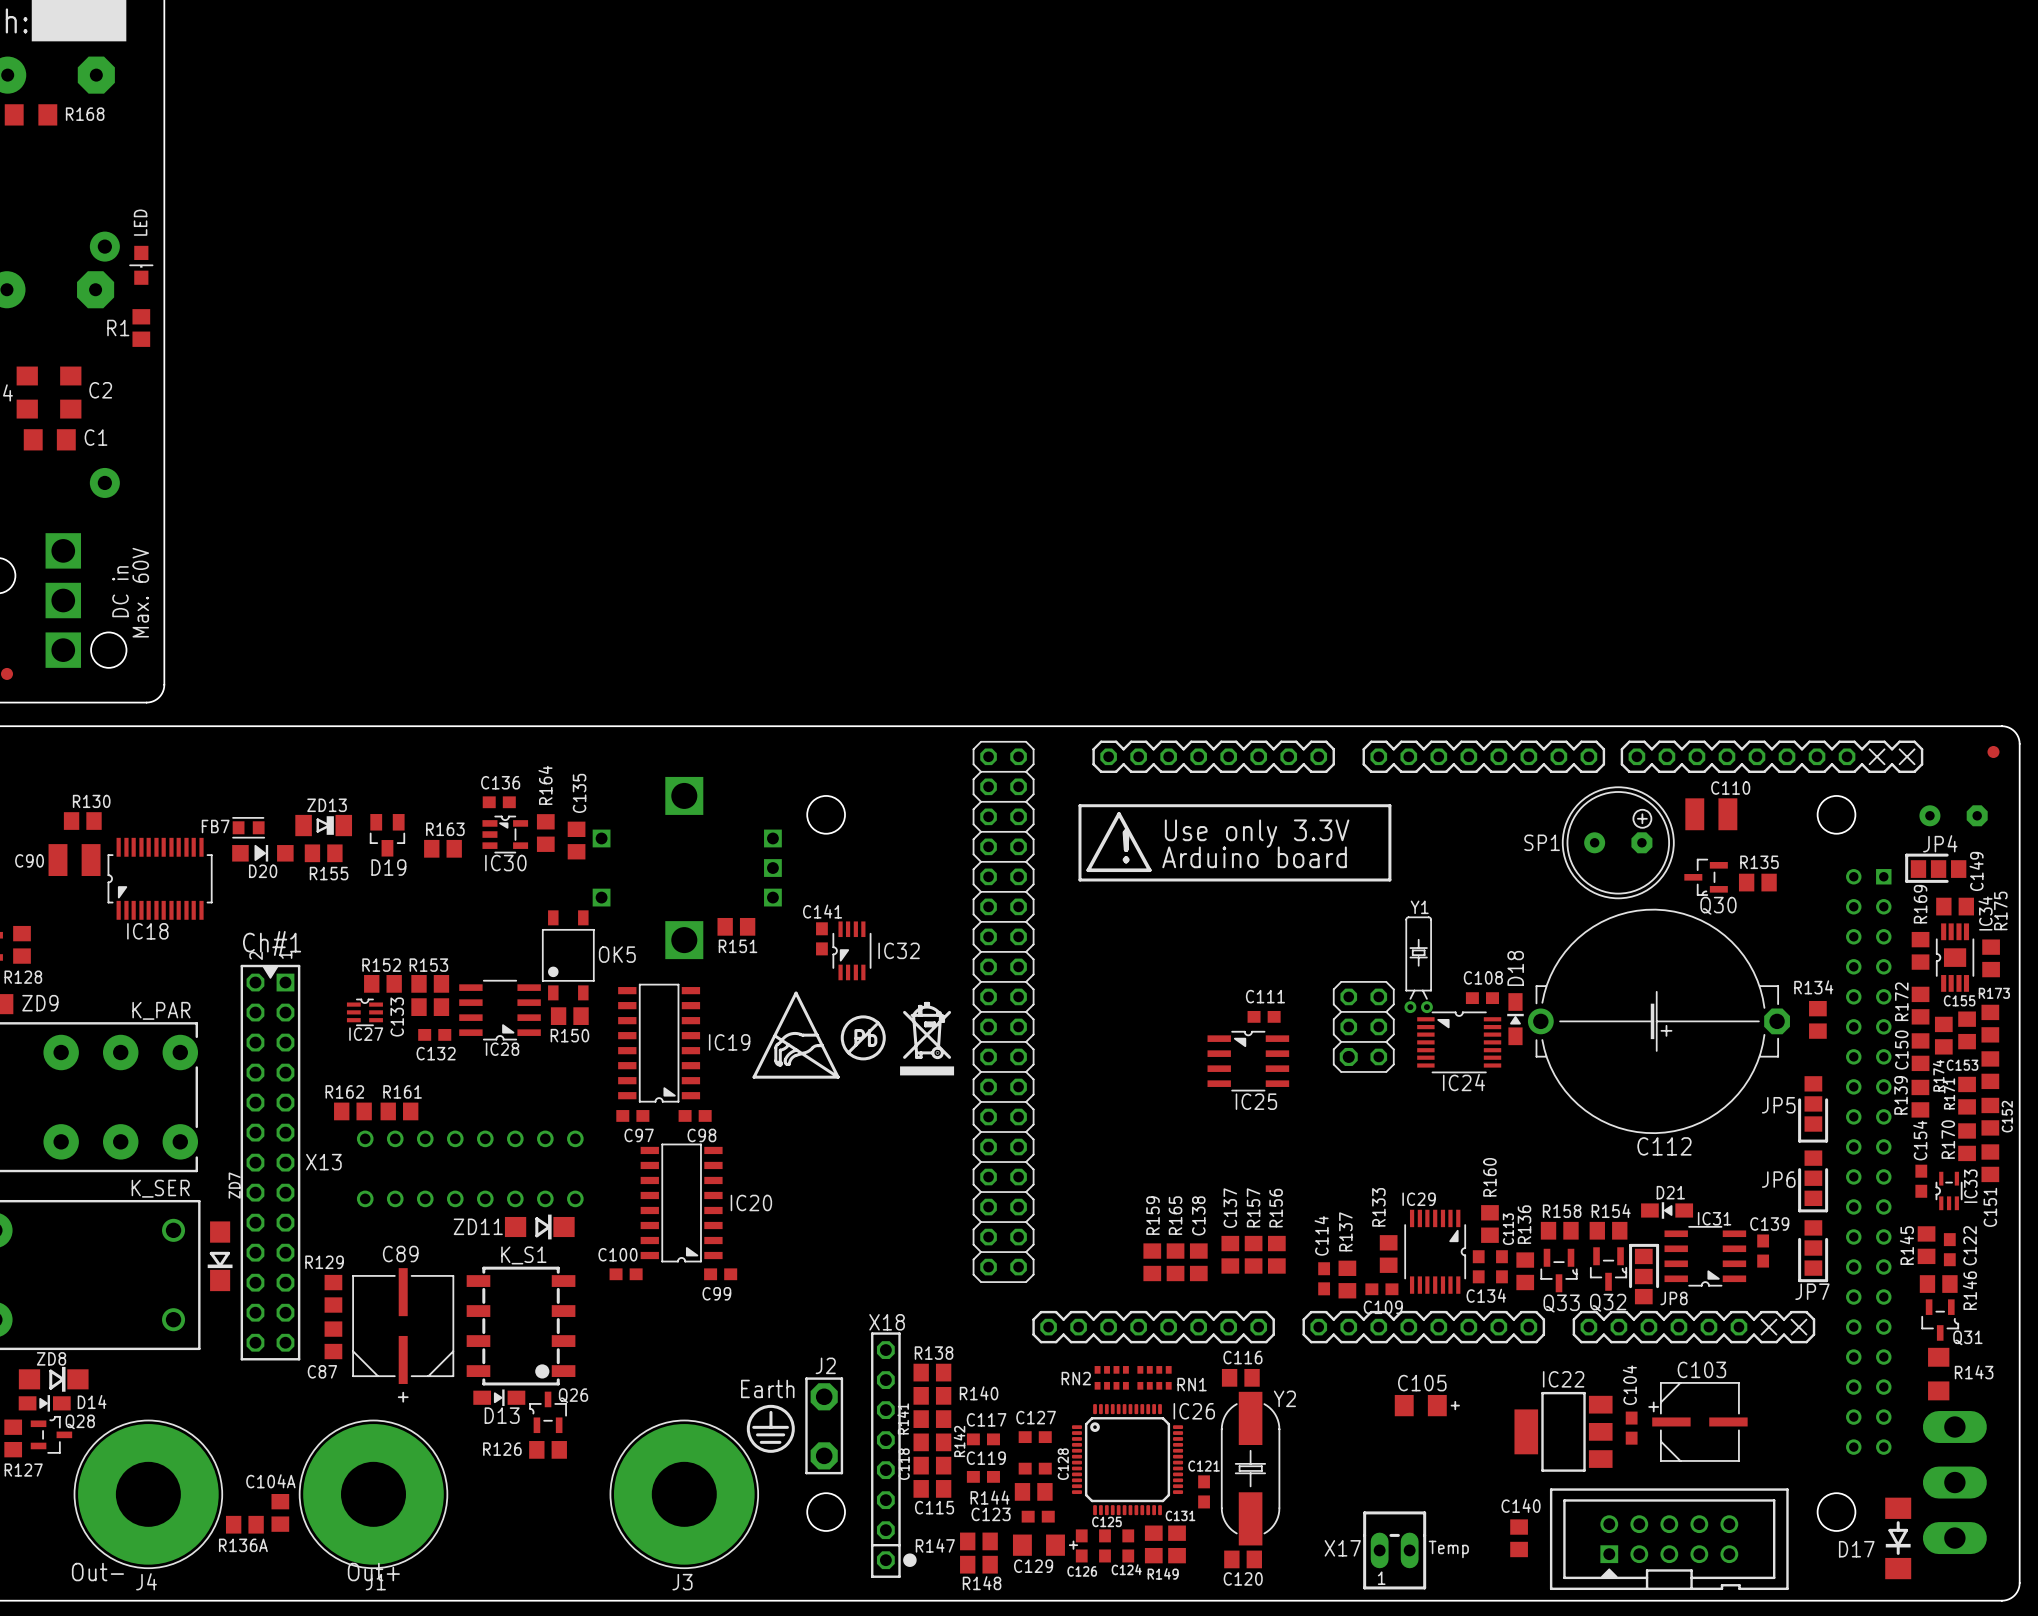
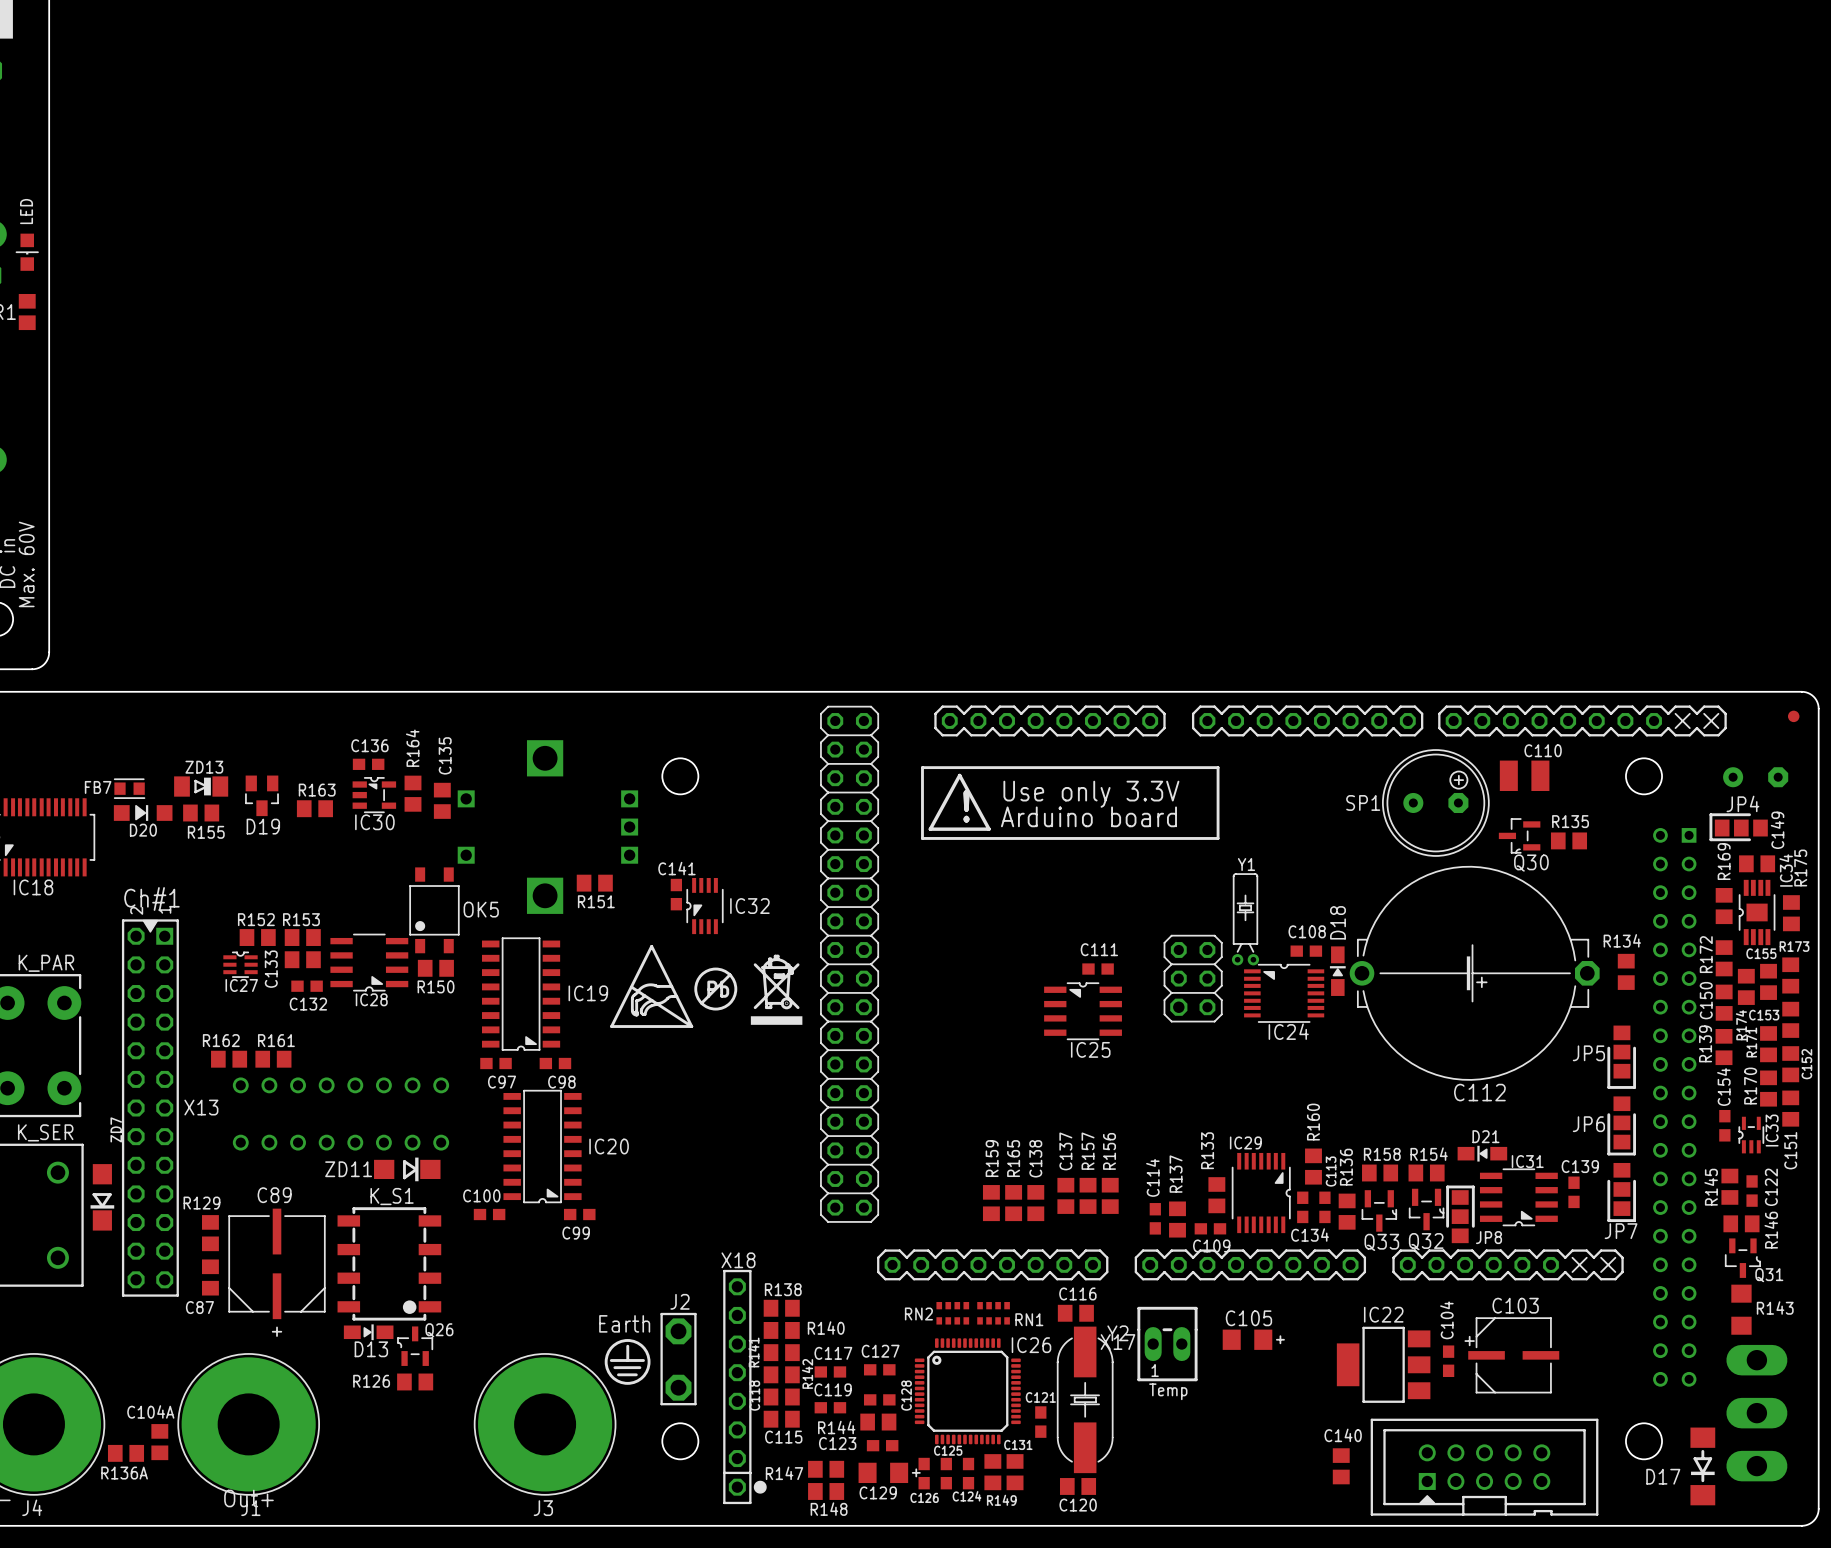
text position: Temp (1448, 1549) -> Temp (1168, 1391)
X17 position: (1394, 1550) -> (1167, 1344)

